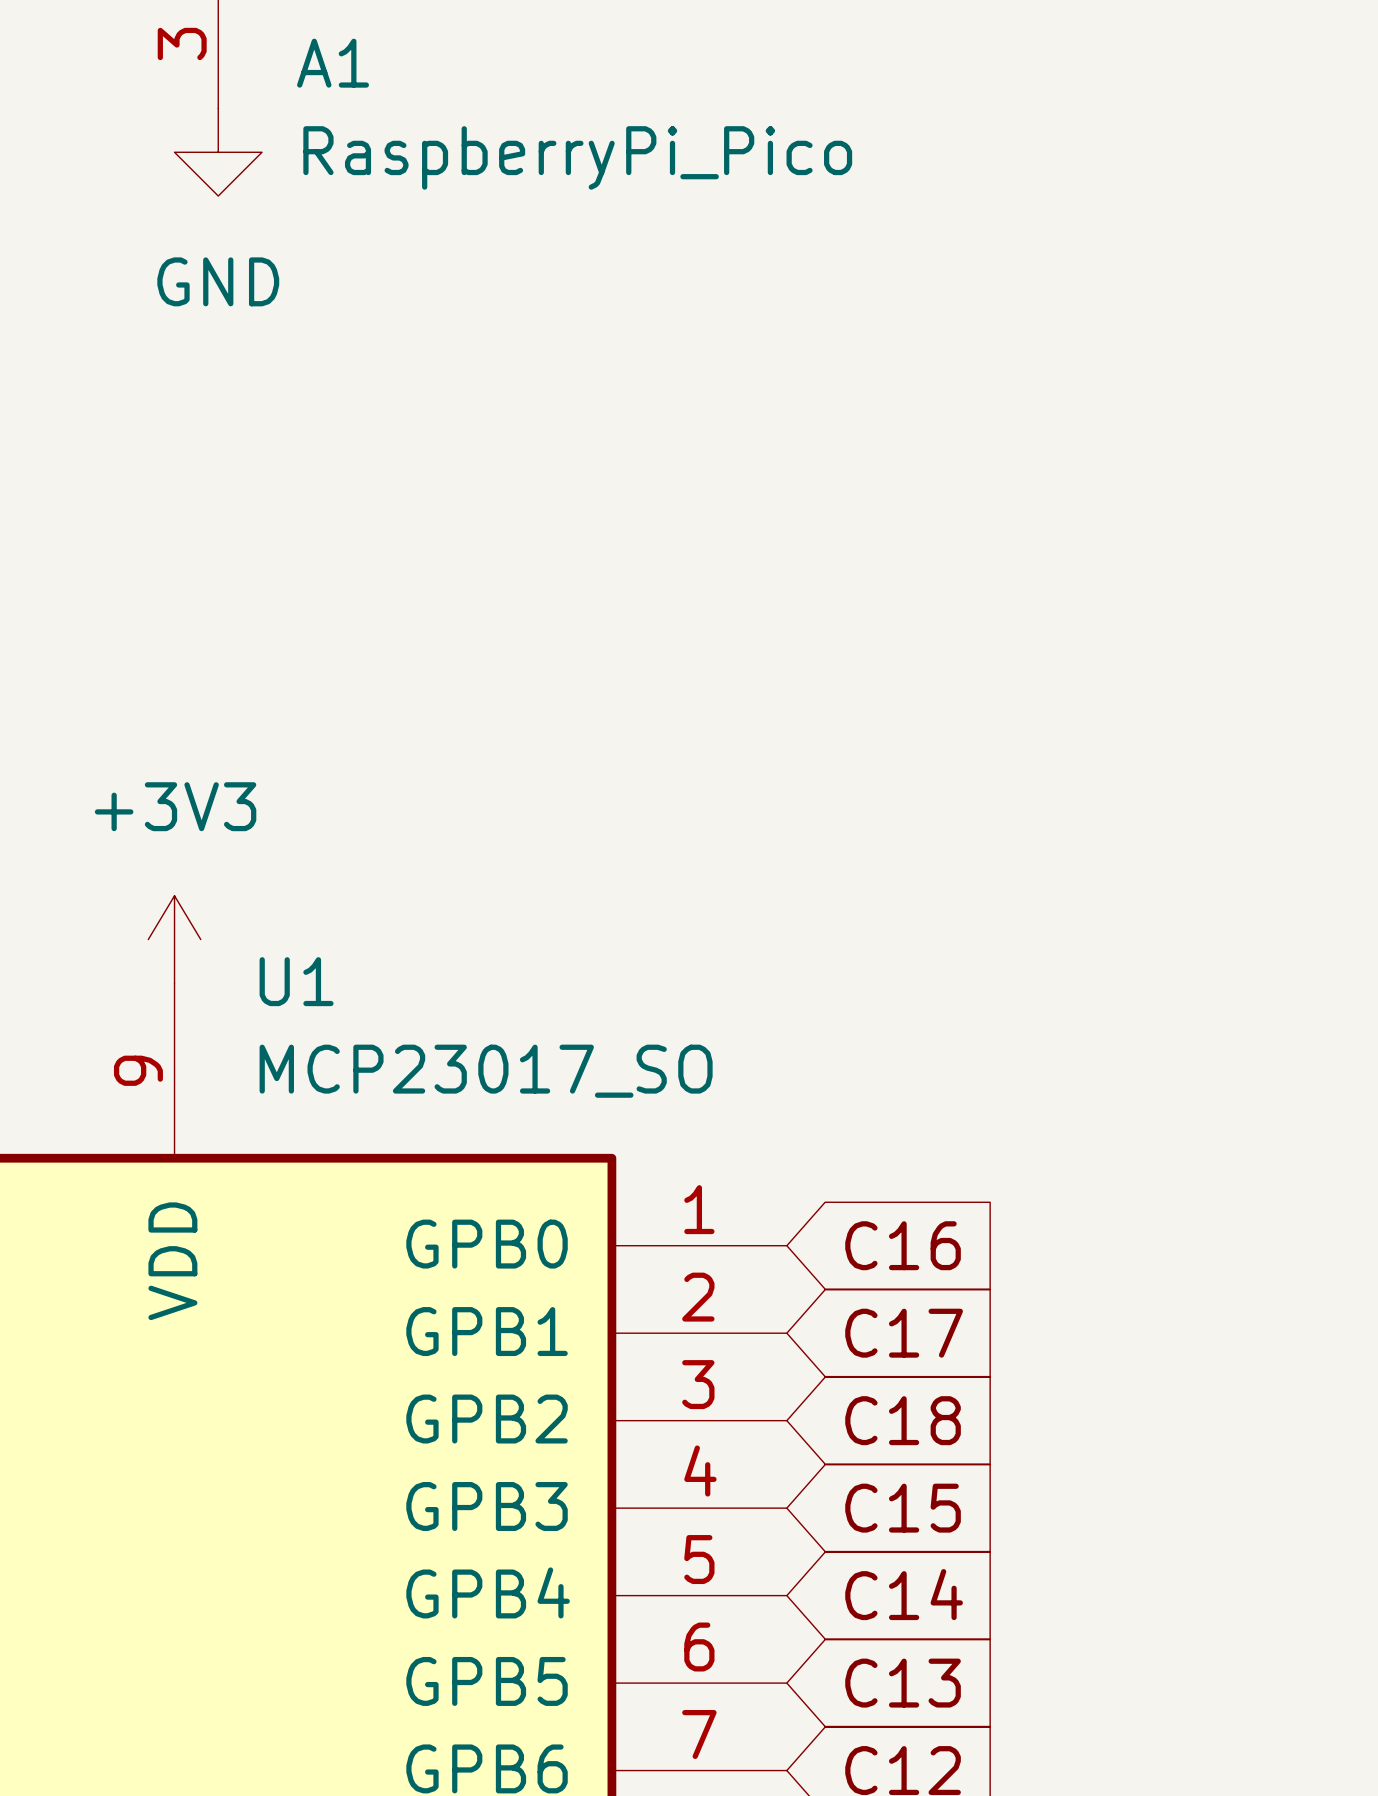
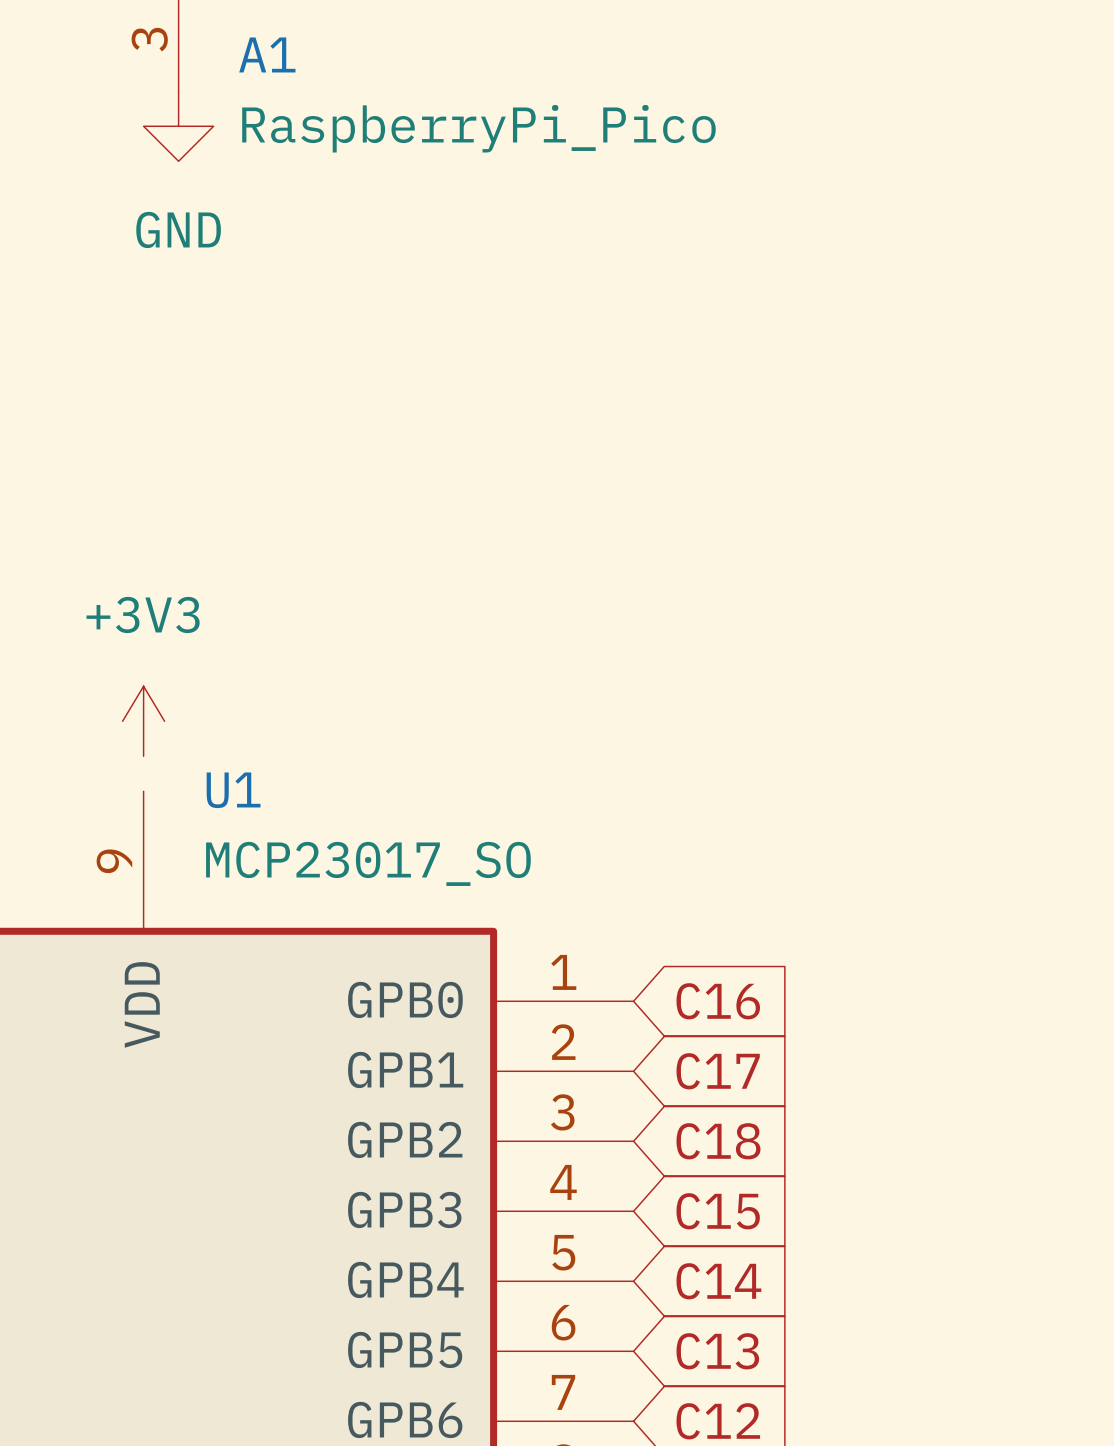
power symbol position: +3V3 (174, 939) -> +3V3 (143, 721)

